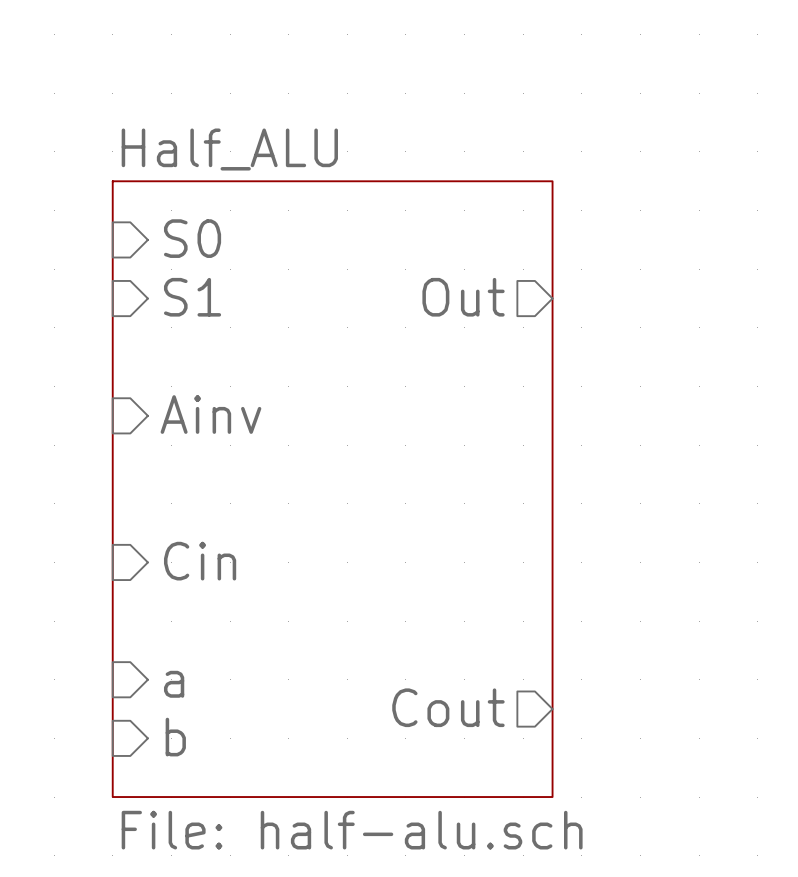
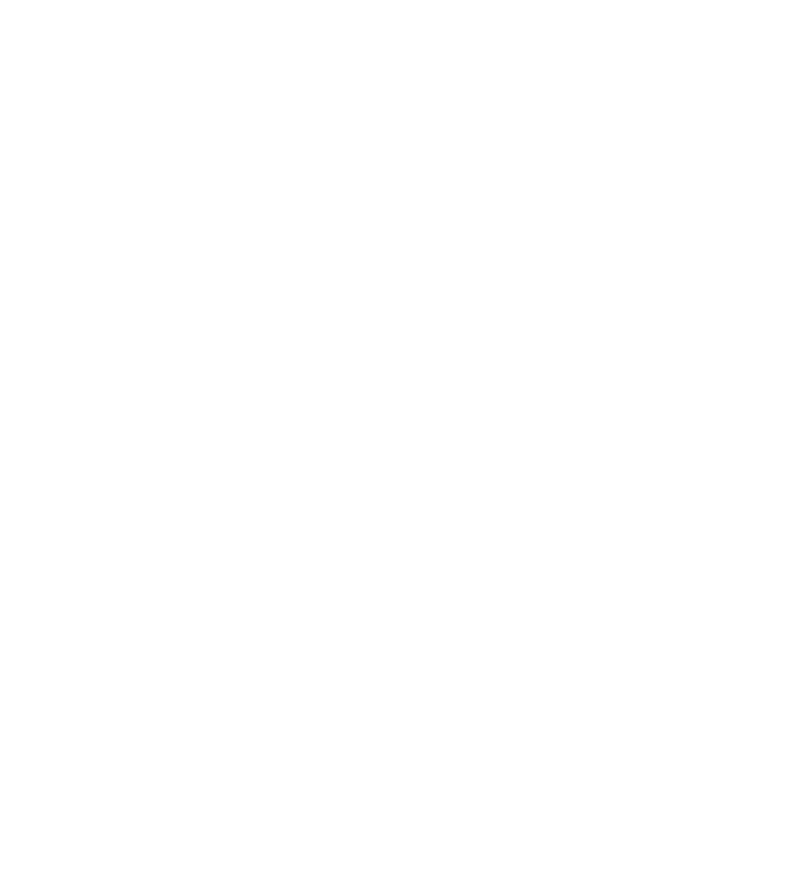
sheet pin: S0 (192, 238) -> none
sheet pin: S1 (192, 297) -> none
sheet pin: Out (463, 297) -> none
sheet pin: Ainv (210, 414) -> none
sheet Half_ALU: File: half-alu.sch (332, 489) -> none
sheet pin: Cin (200, 561) -> none
sheet pin: a (174, 684) -> none
sheet pin: Cout (448, 707) -> none
sheet pin: b (175, 737) -> none

